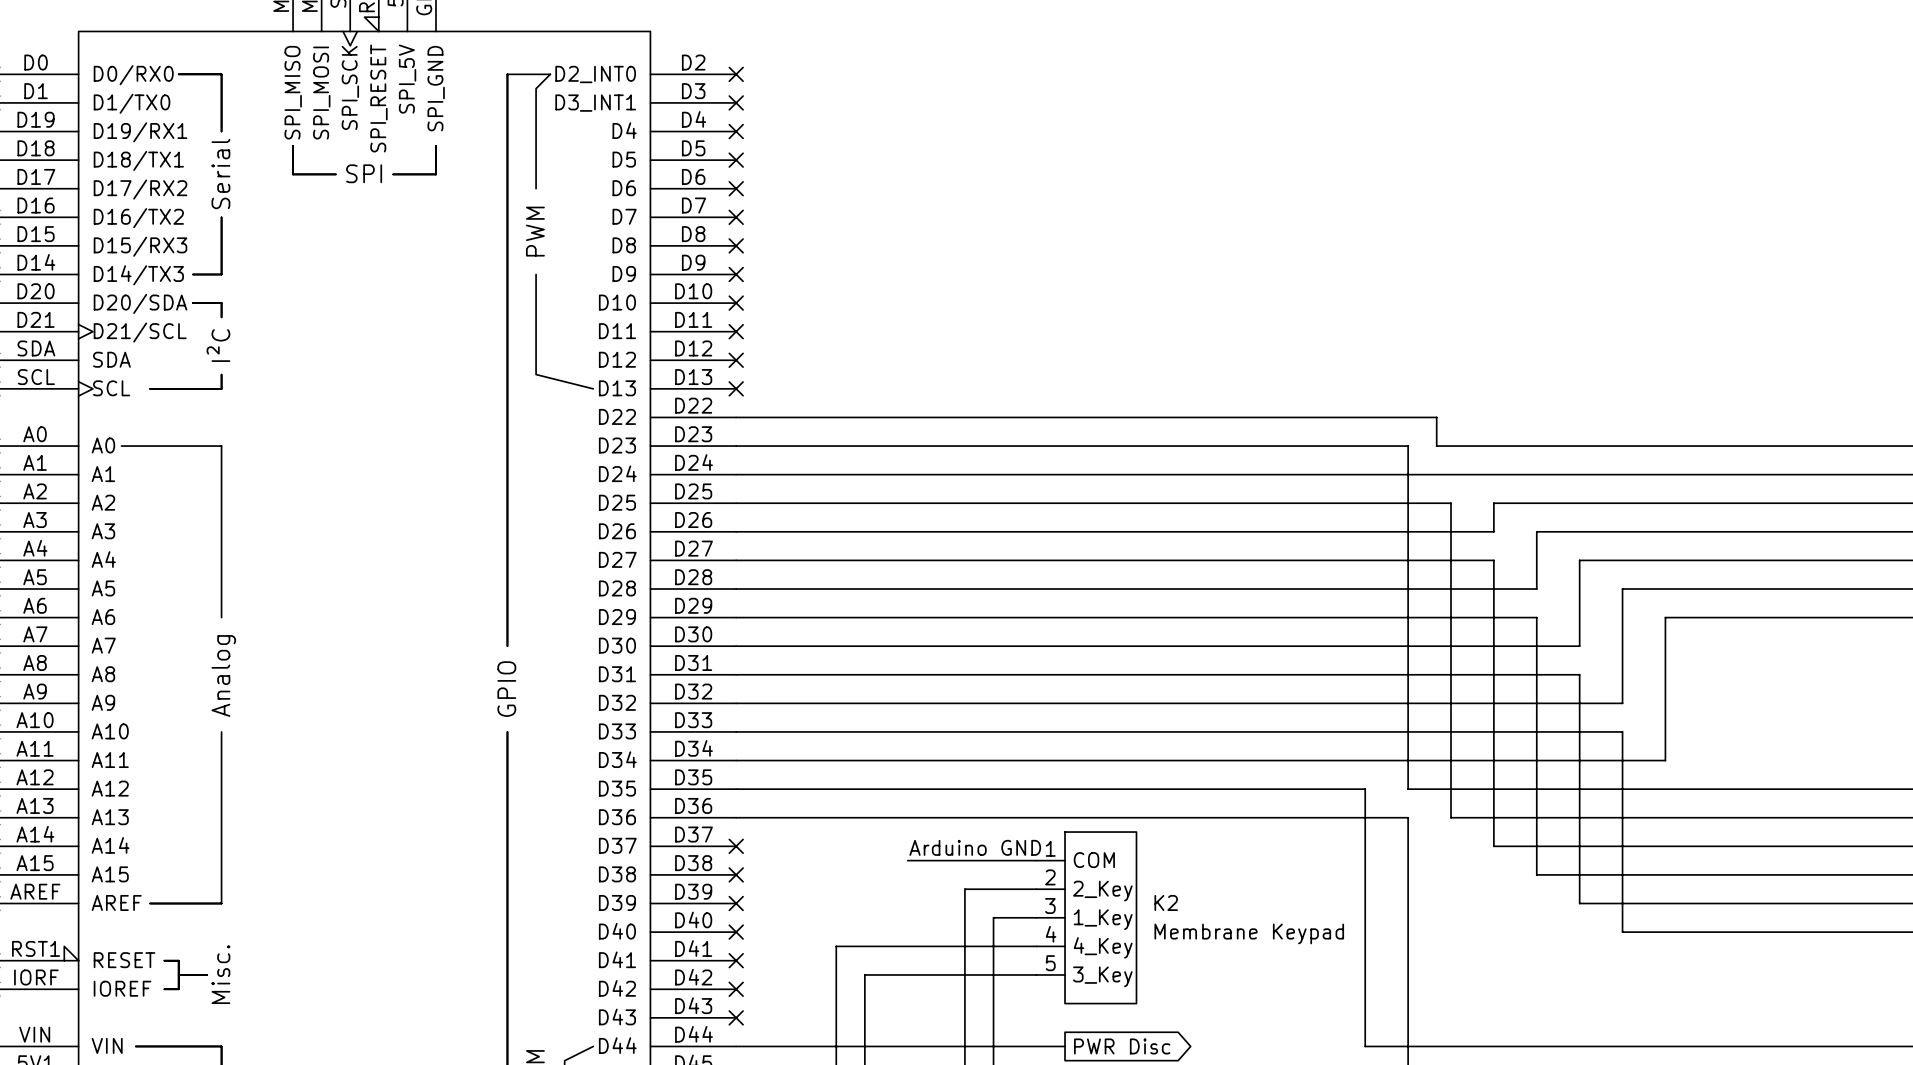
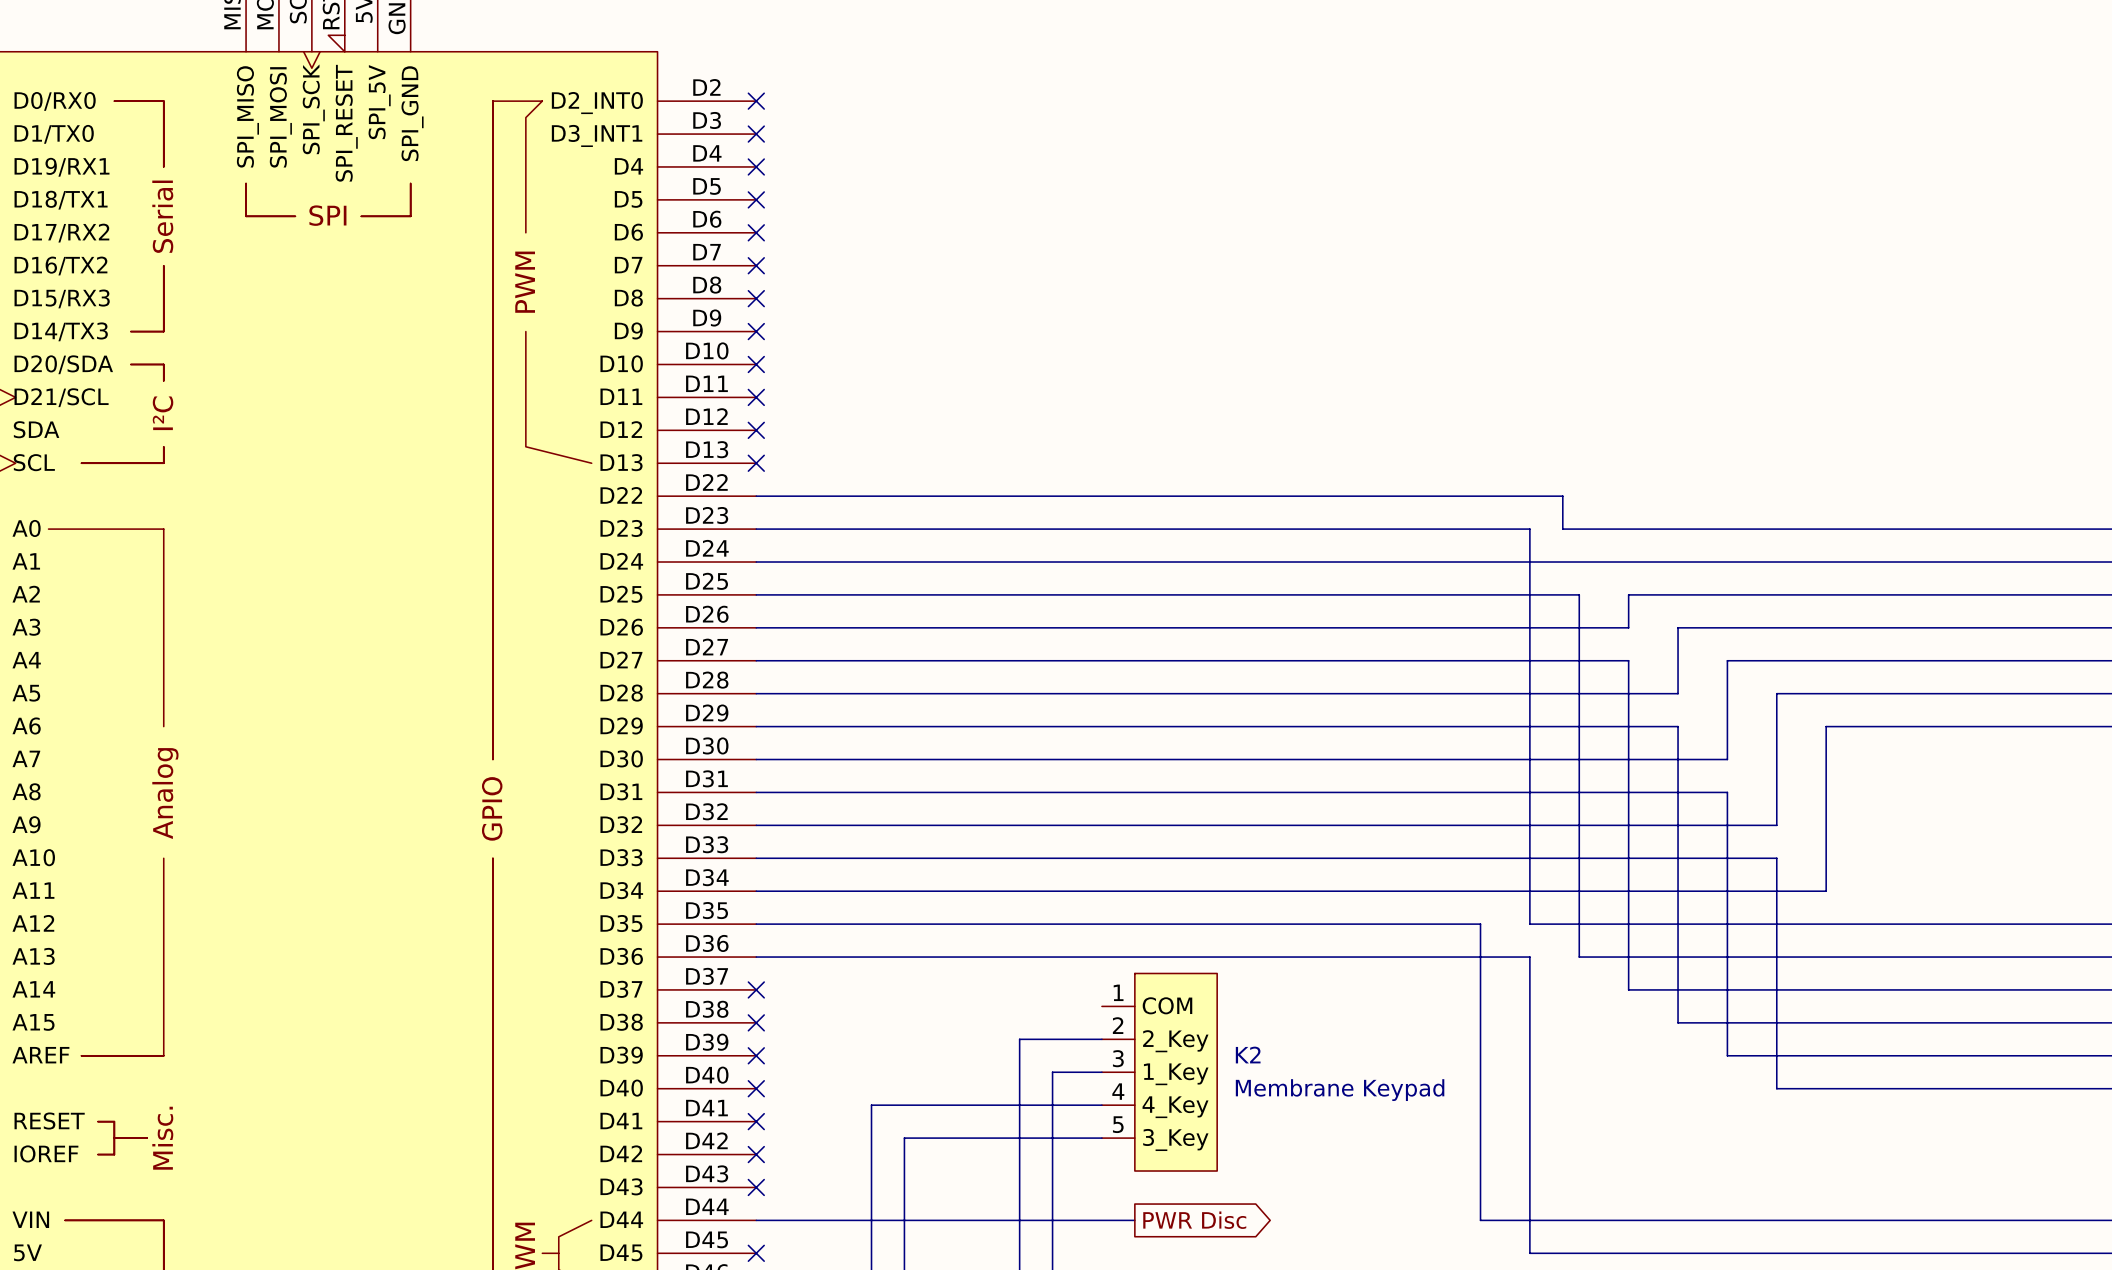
label: Arduino GND (975, 847) -> none
wire: (907, 860) (1036, 860) -> none

